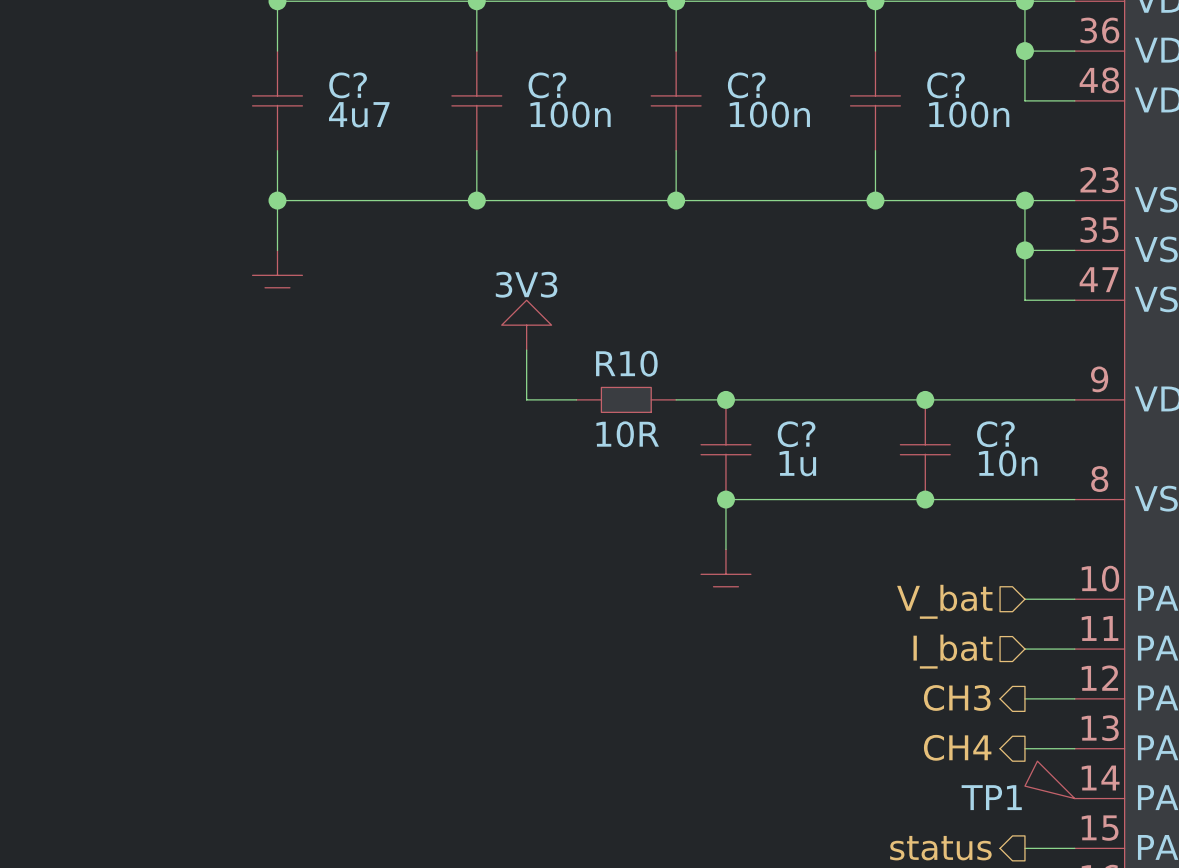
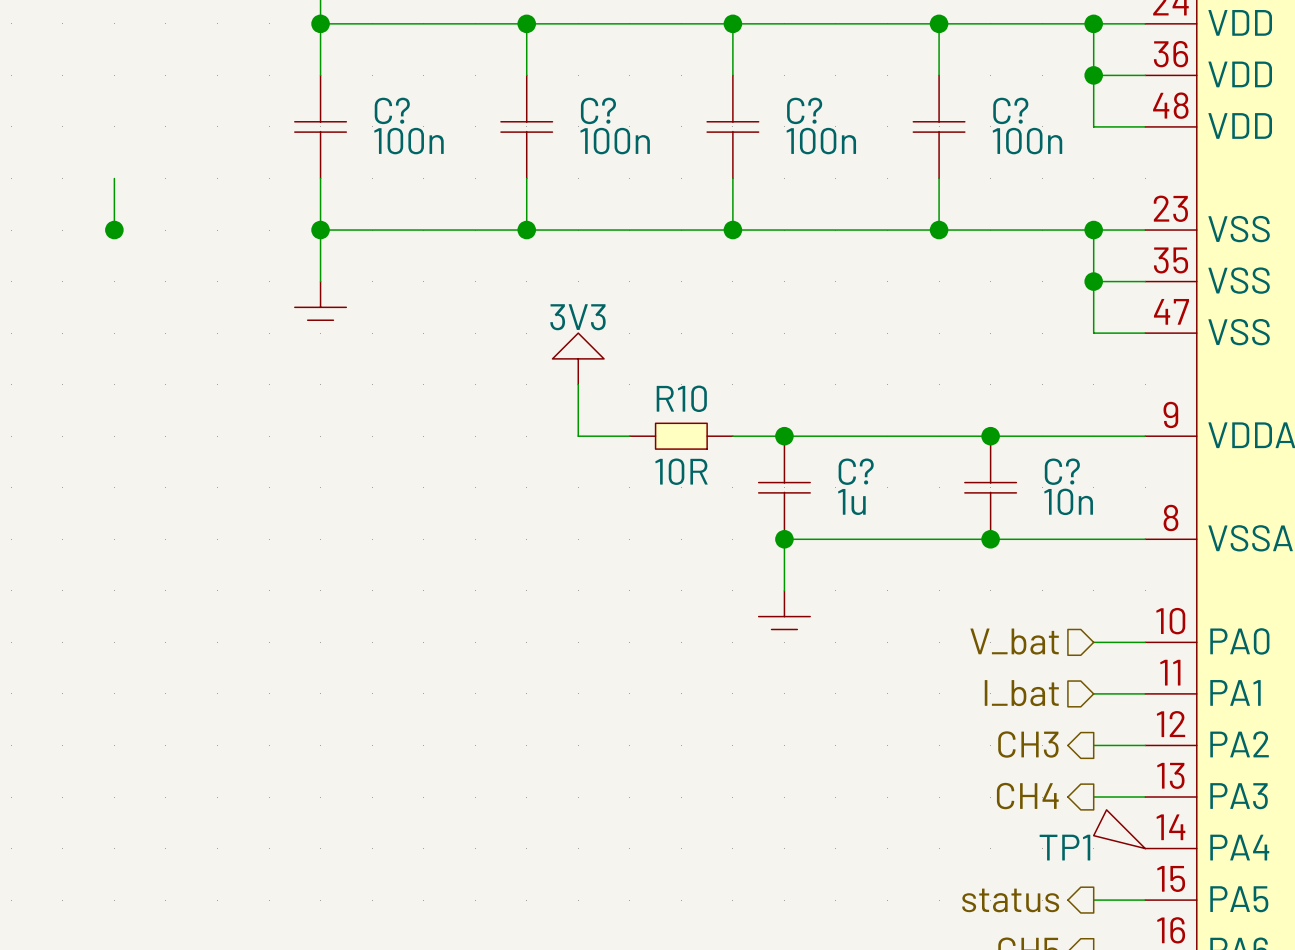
C? value: 4u7 (359, 114) -> 100n (408, 141)
wire: none -> (114, 178) (114, 230)
junction: none -> (114, 230)

